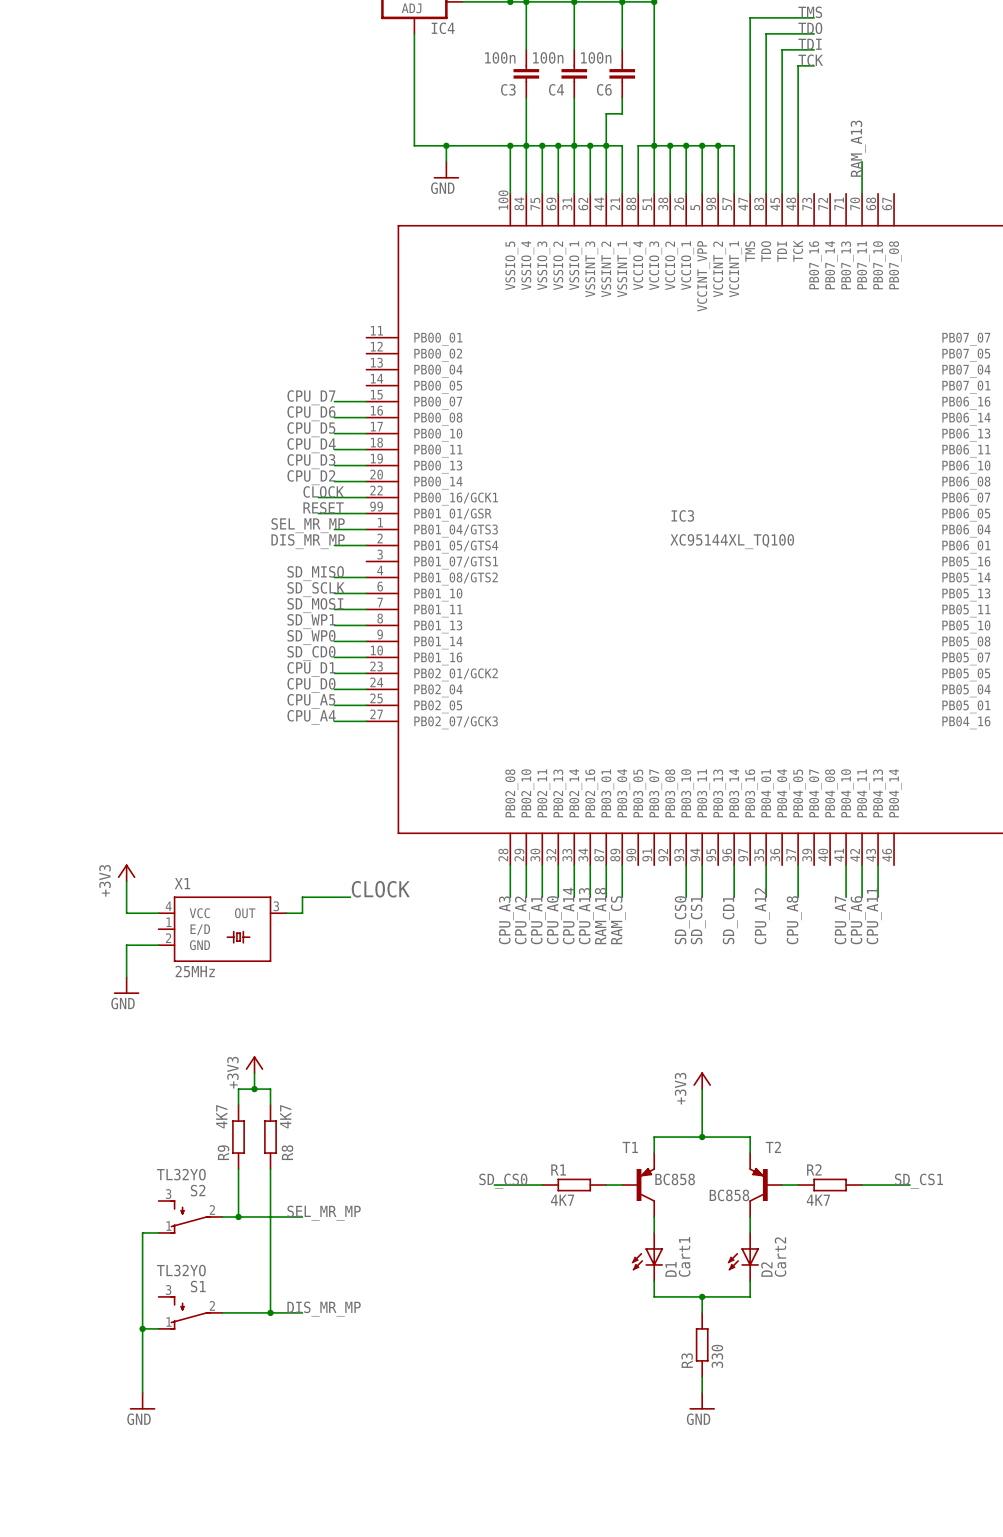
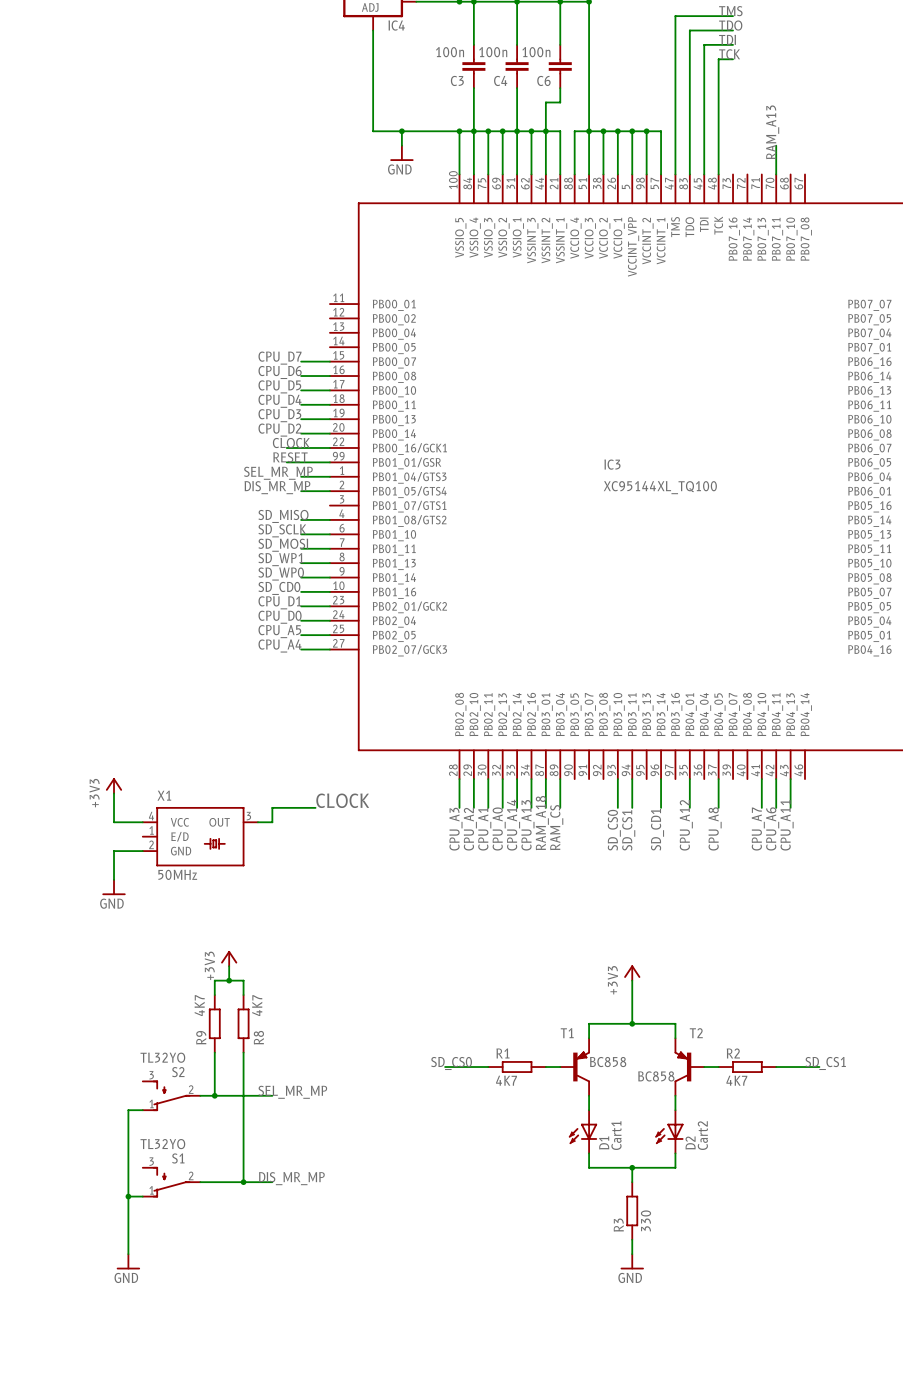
X1 value: 25MHz (195, 971) -> 50MHz (177, 874)

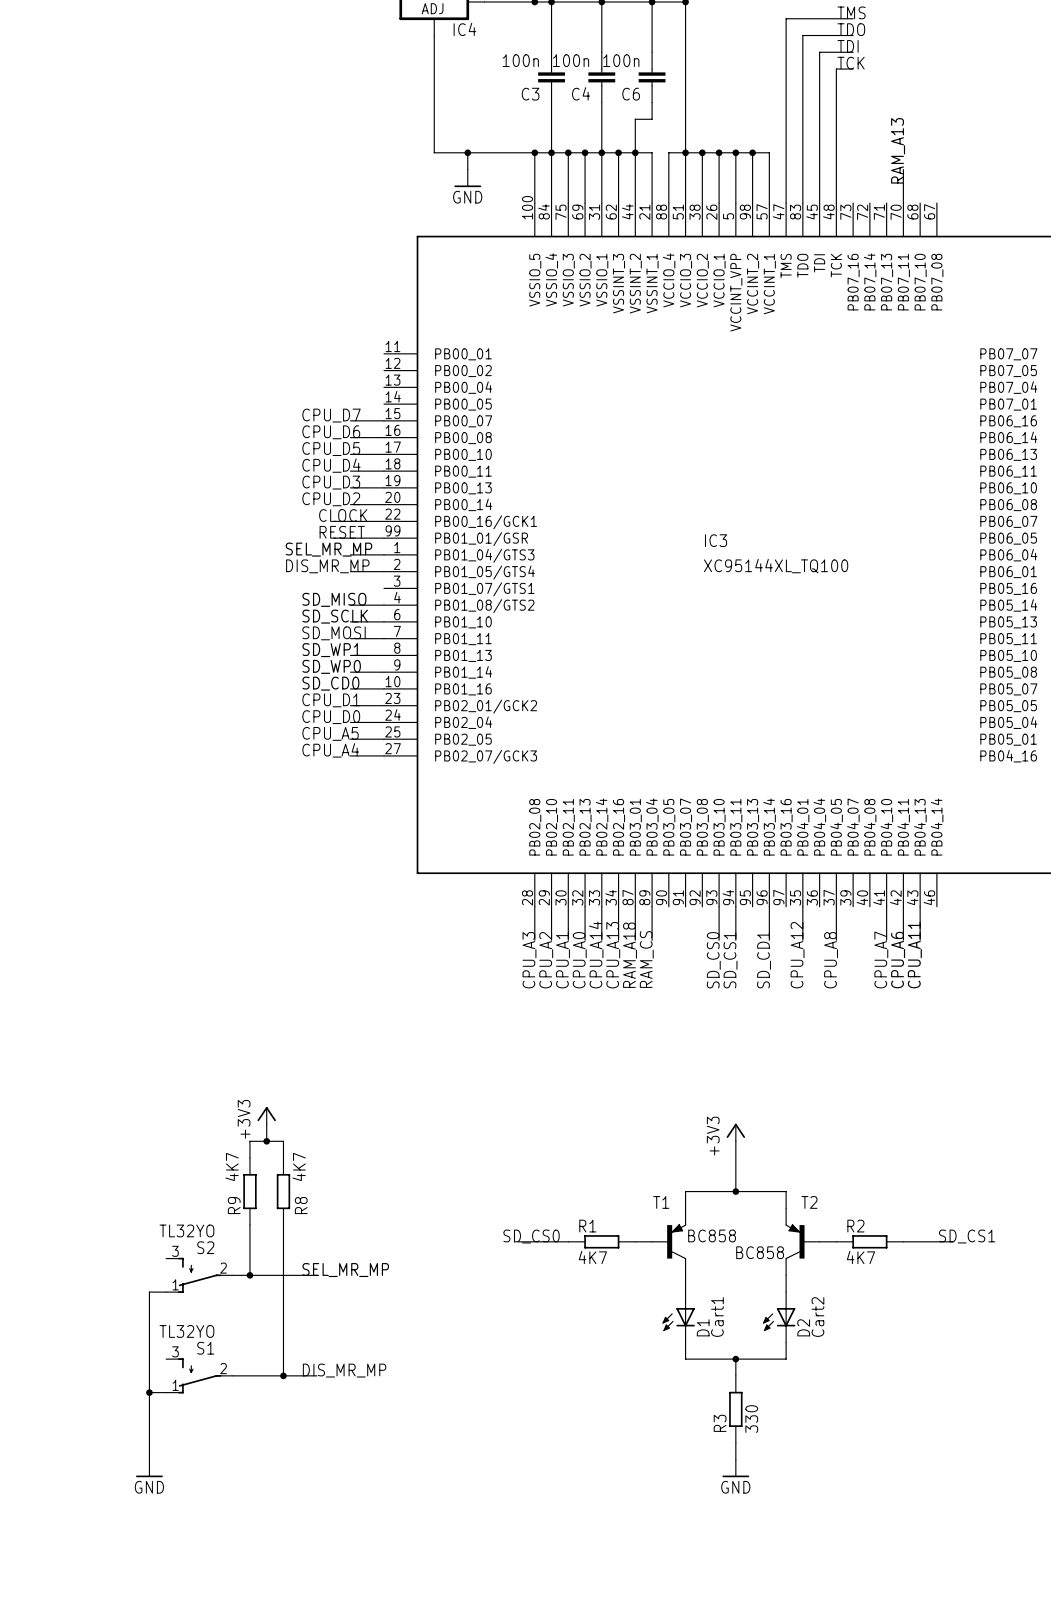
power symbol: +3V3 (114, 785) -> none
wire: (114, 793) (114, 822) (142, 822) -> none
label: CLOCK (342, 800) -> none
wire: (315, 807) (272, 807) (272, 822) (257, 822) -> none
X1: 50MHz (200, 836) -> none
wire: (142, 851) (114, 851) (114, 879) -> none
power symbol: GND (114, 887) -> none

